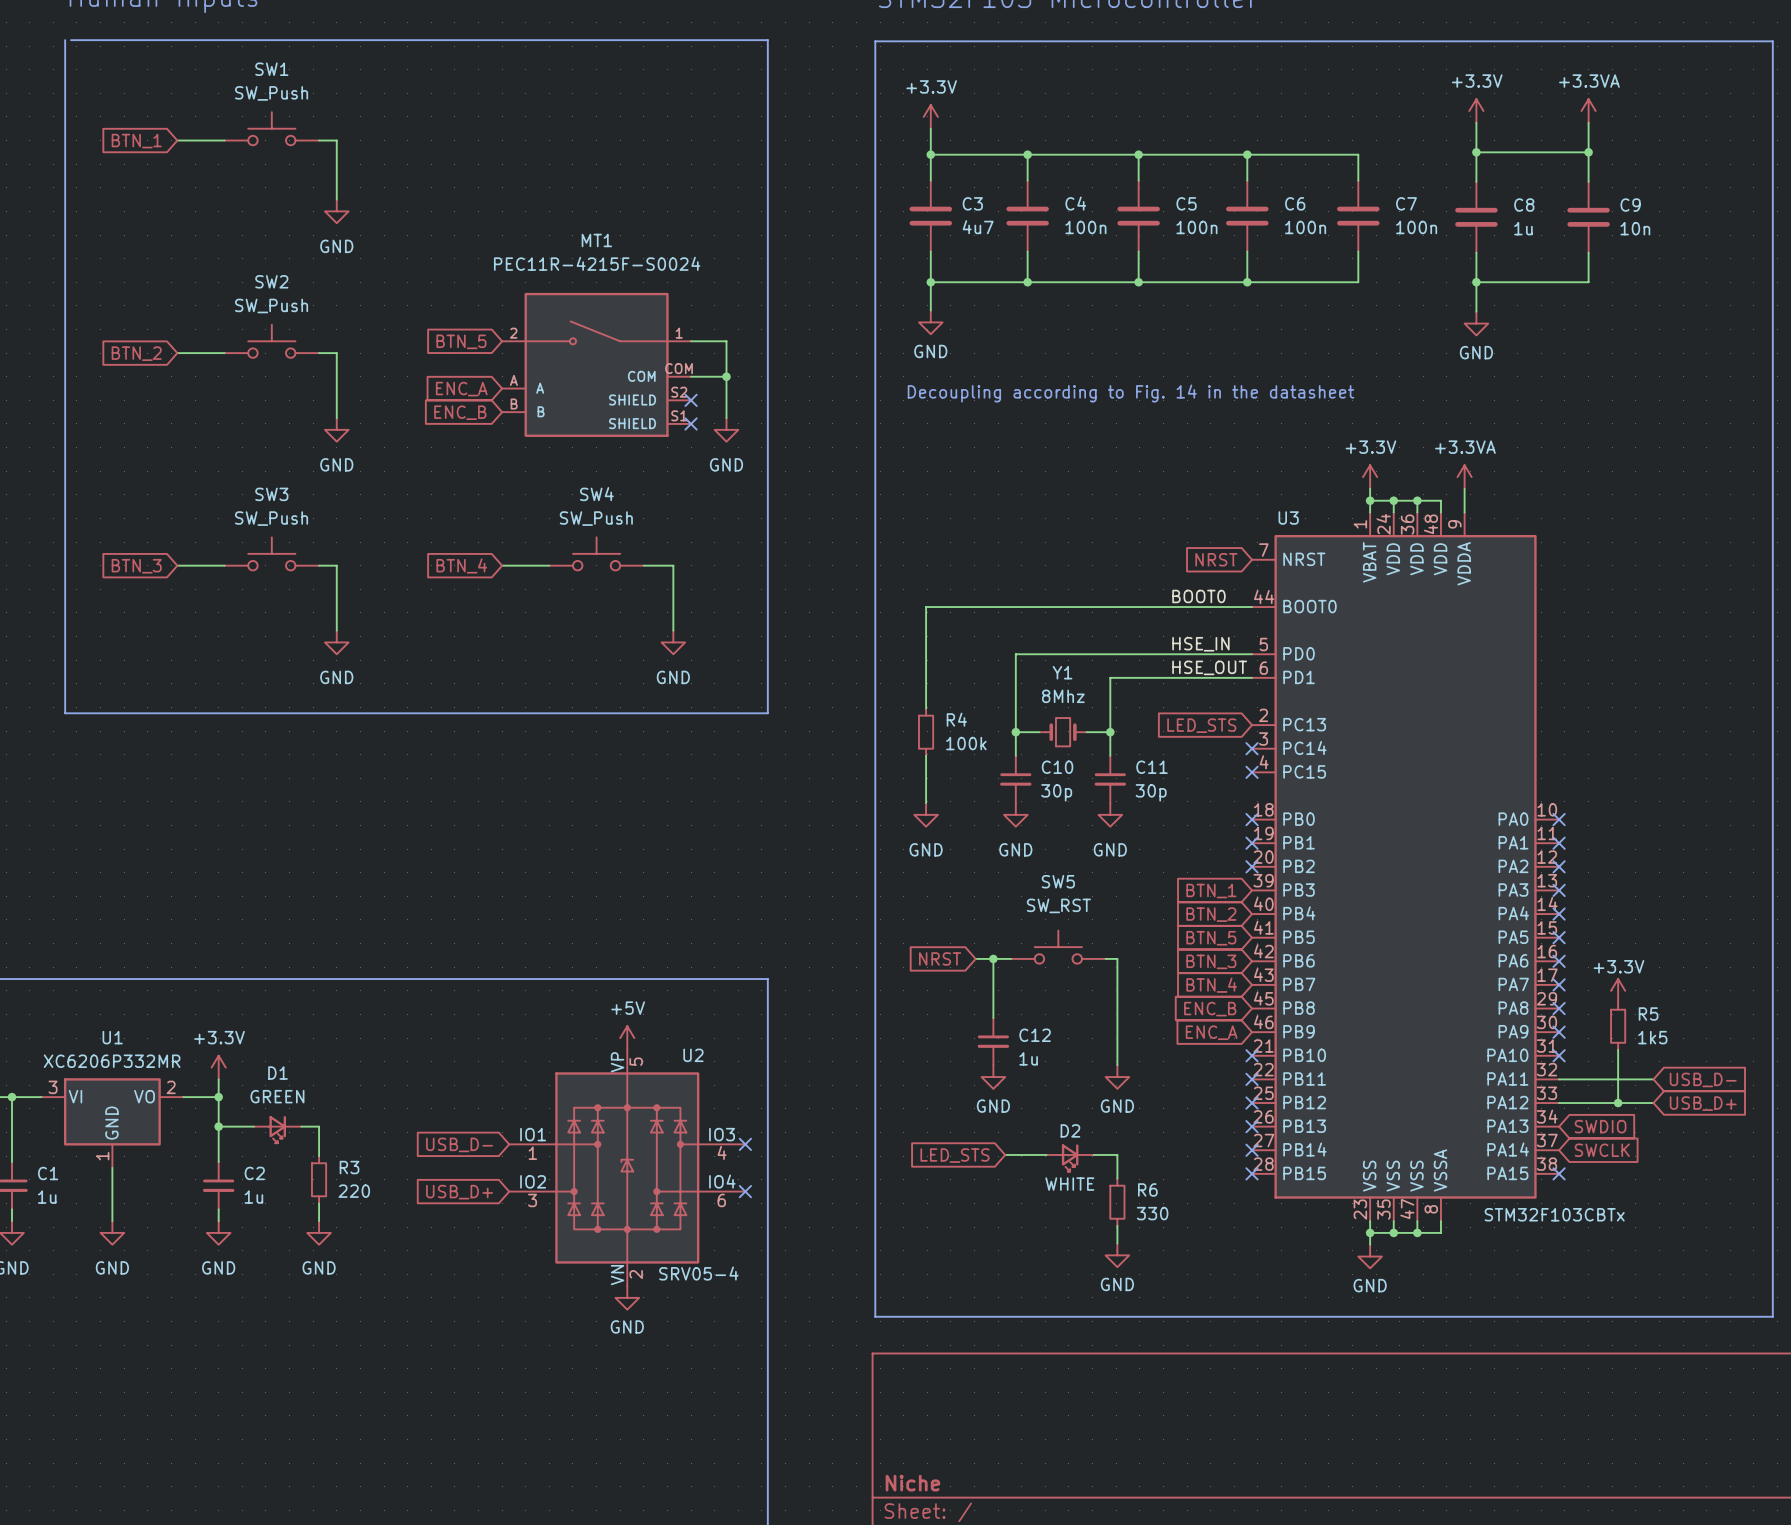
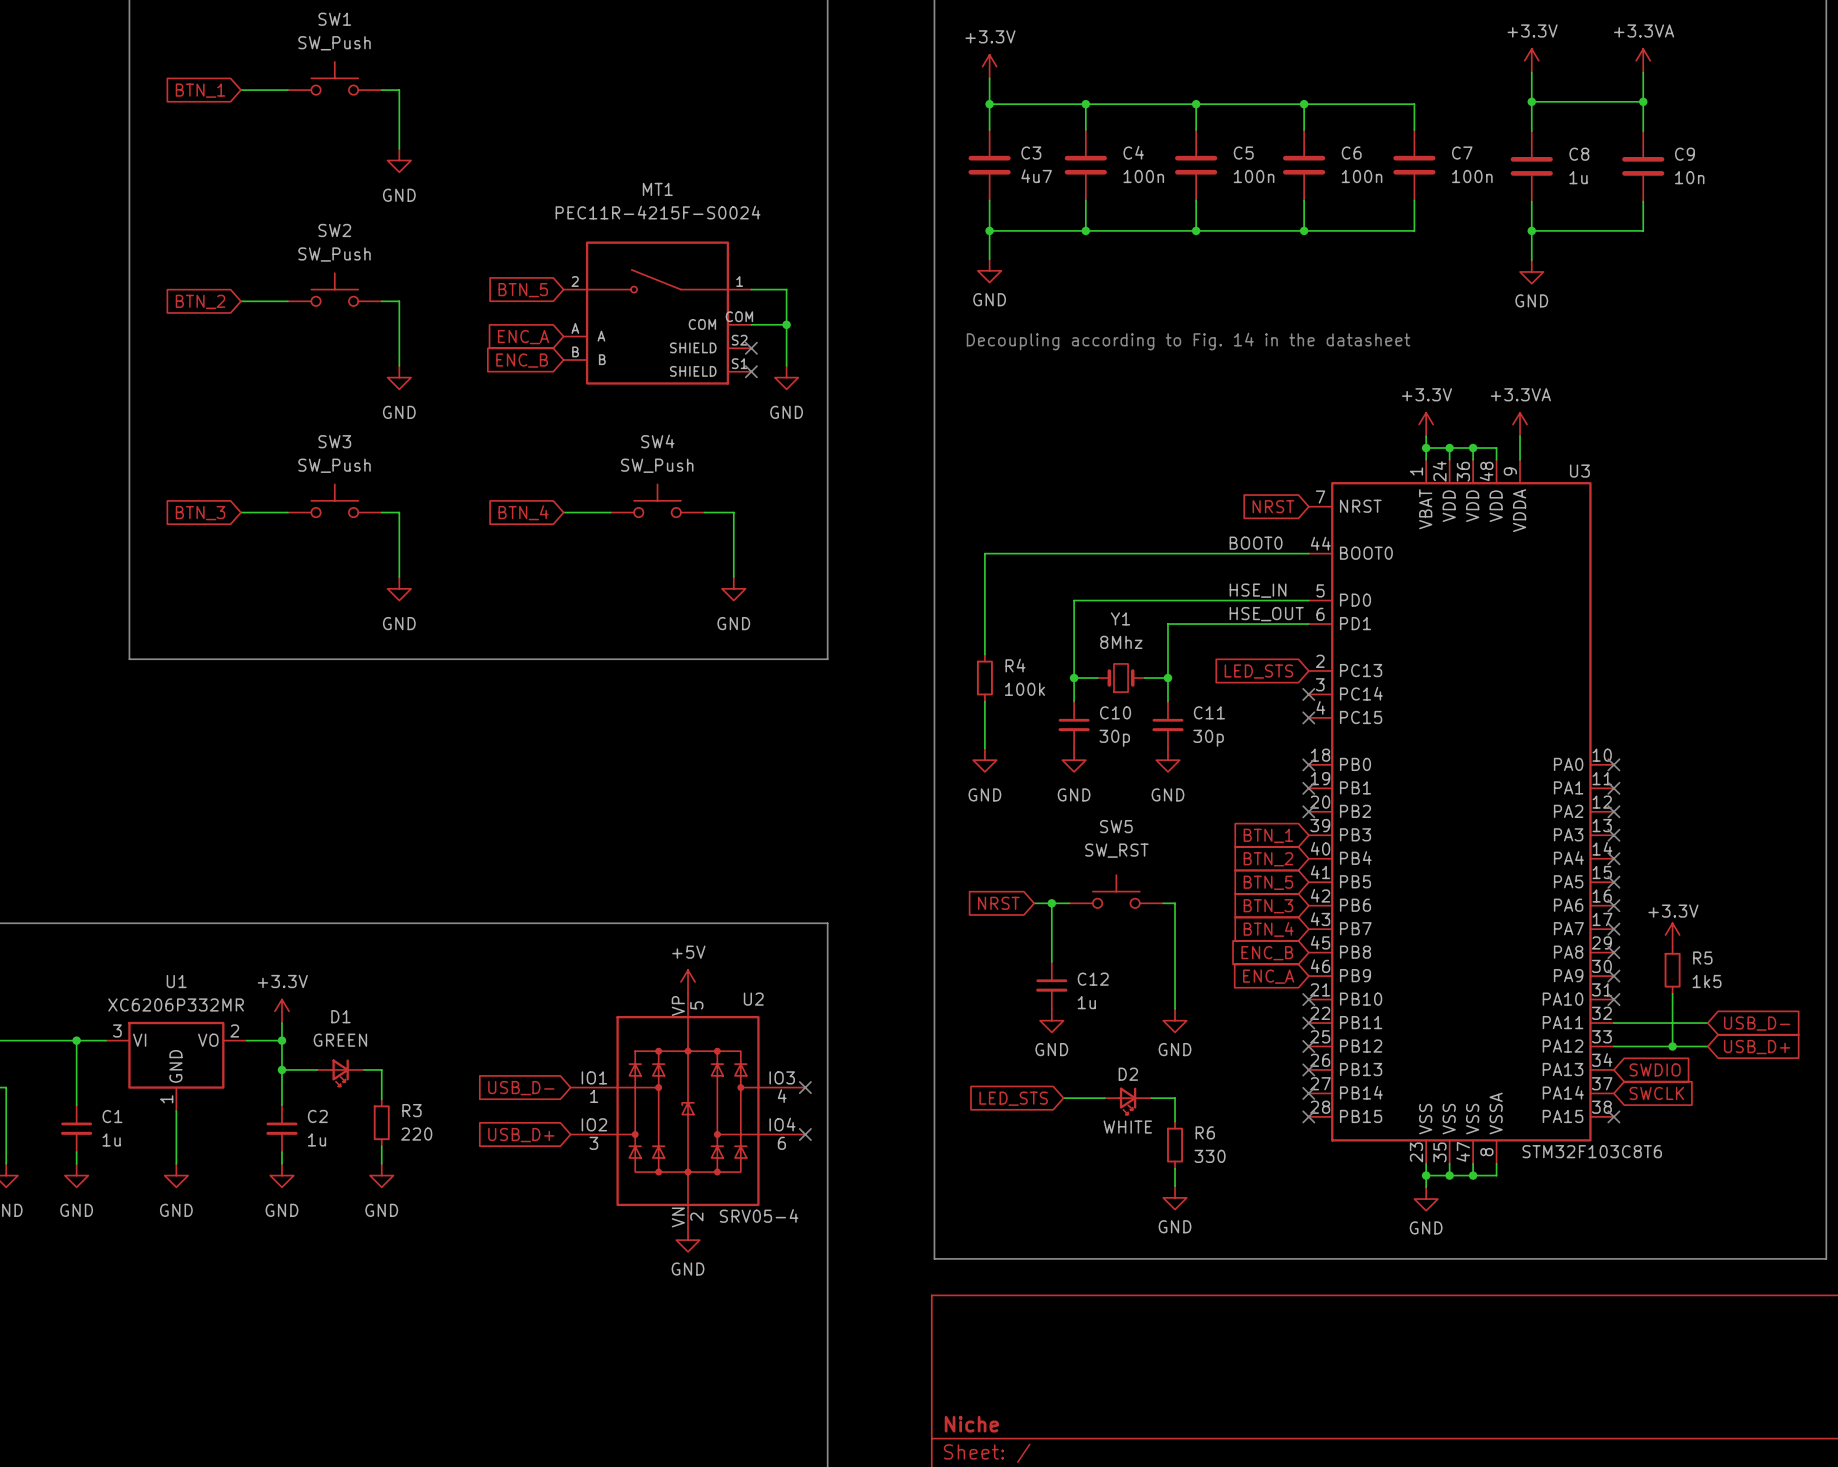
U3 name position: U3 (1288, 518) -> U3 (1579, 471)
U3 value: STM32F103CBTx (1554, 1214) -> STM32F103C8T6 (1592, 1151)

